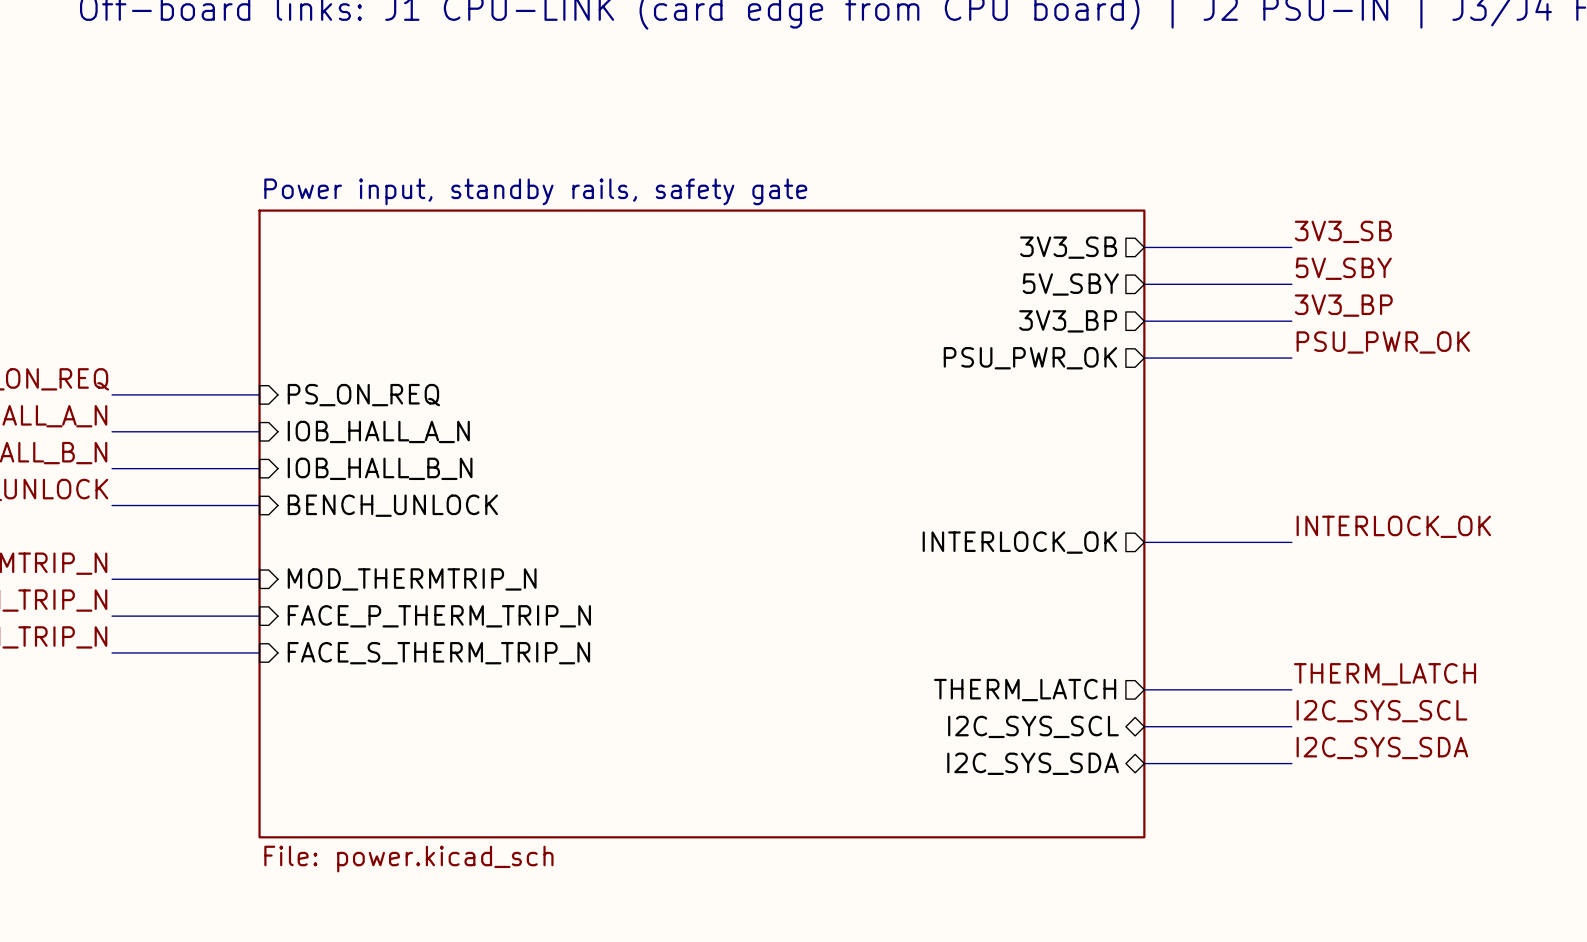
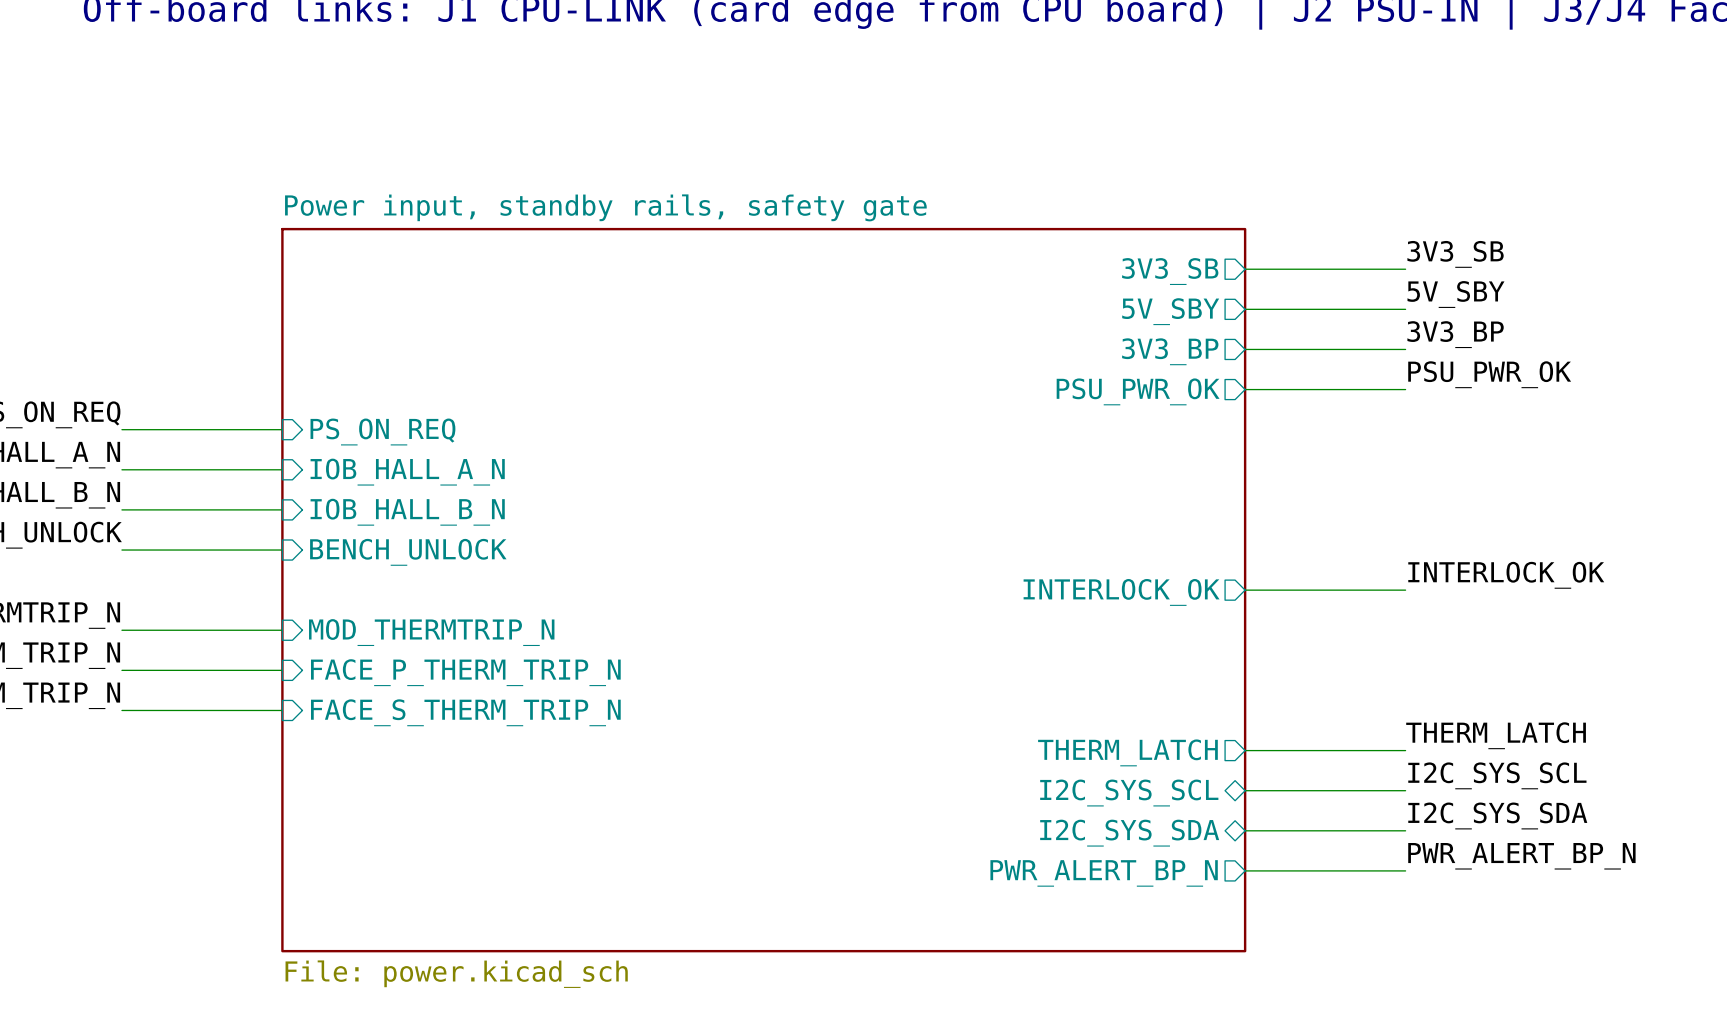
sheet Power input, standby rails, safety gate: File: power.kicad_sch (701, 523) -> none
sheet Power input, standby rails, safety gate: none -> File: power.kicad_sch (763, 590)
label: none -> PWR_ALERT_BP_N (1521, 856)
sheet pin: none -> PWR_ALERT_BP_N (1104, 873)
wire: none -> (1245, 870) (1405, 870)

